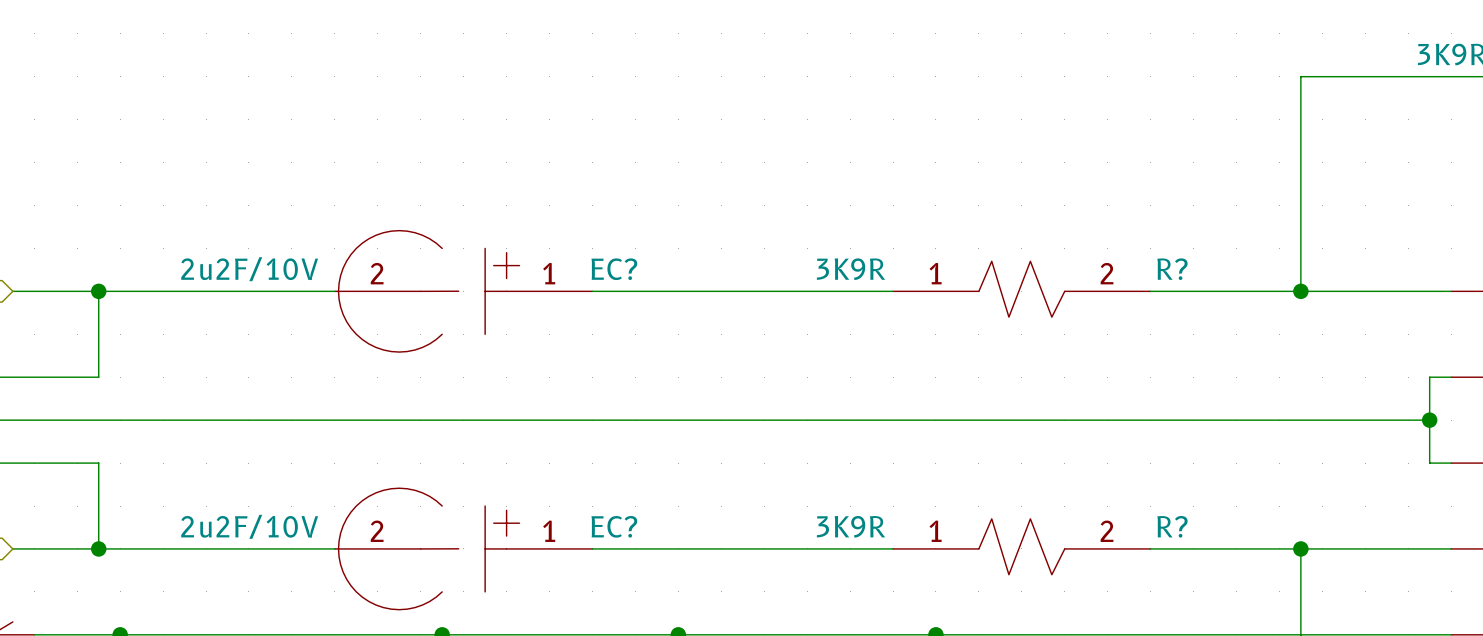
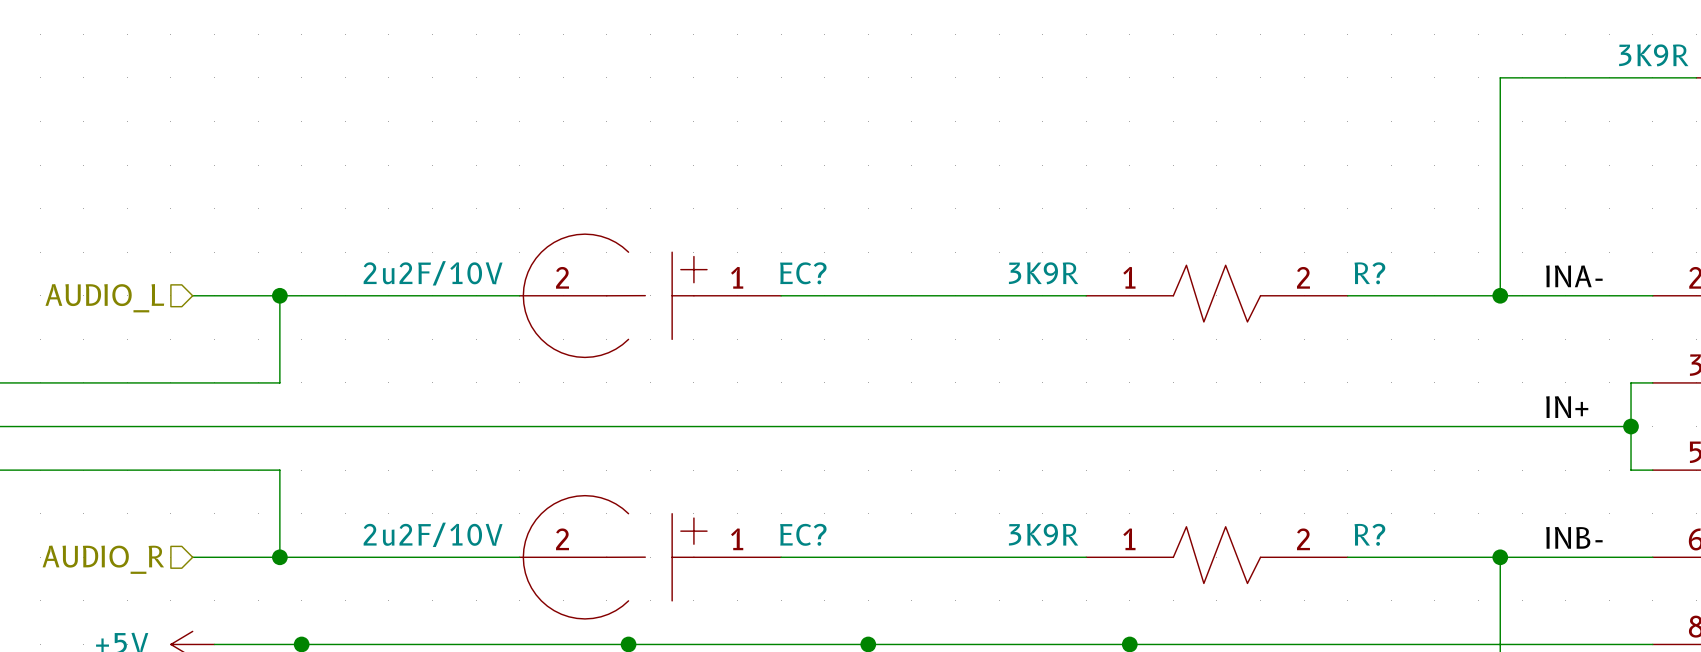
label: none -> INA- (1574, 276)
label: none -> IN+ (1567, 407)
label: none -> INB- (1574, 537)

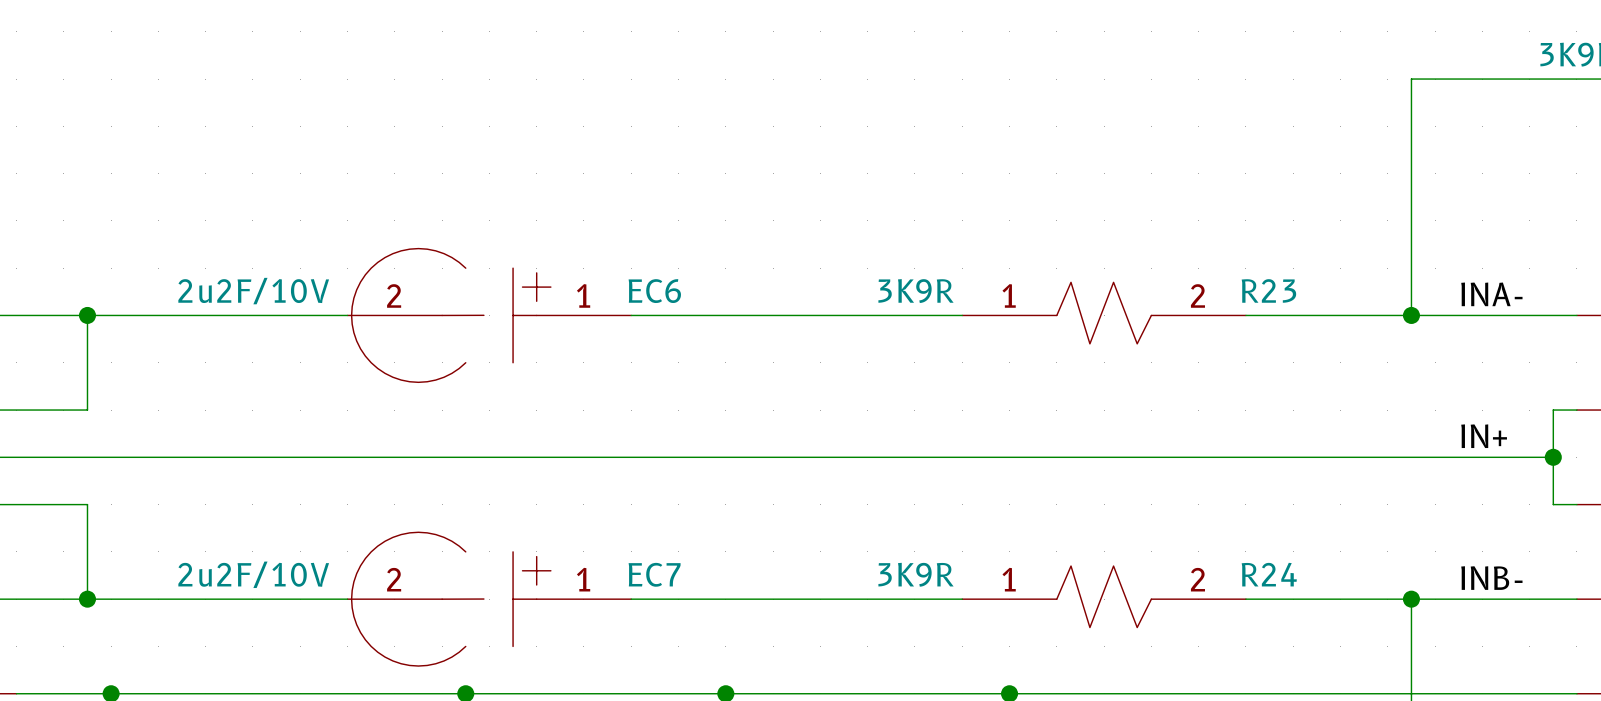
EC? name: EC? (803, 273) -> EC6 (654, 291)
R? name: R? (1369, 273) -> R23 (1268, 290)
EC? name: EC? (803, 534) -> EC7 (654, 574)
R? name: R? (1369, 534) -> R24 (1269, 574)

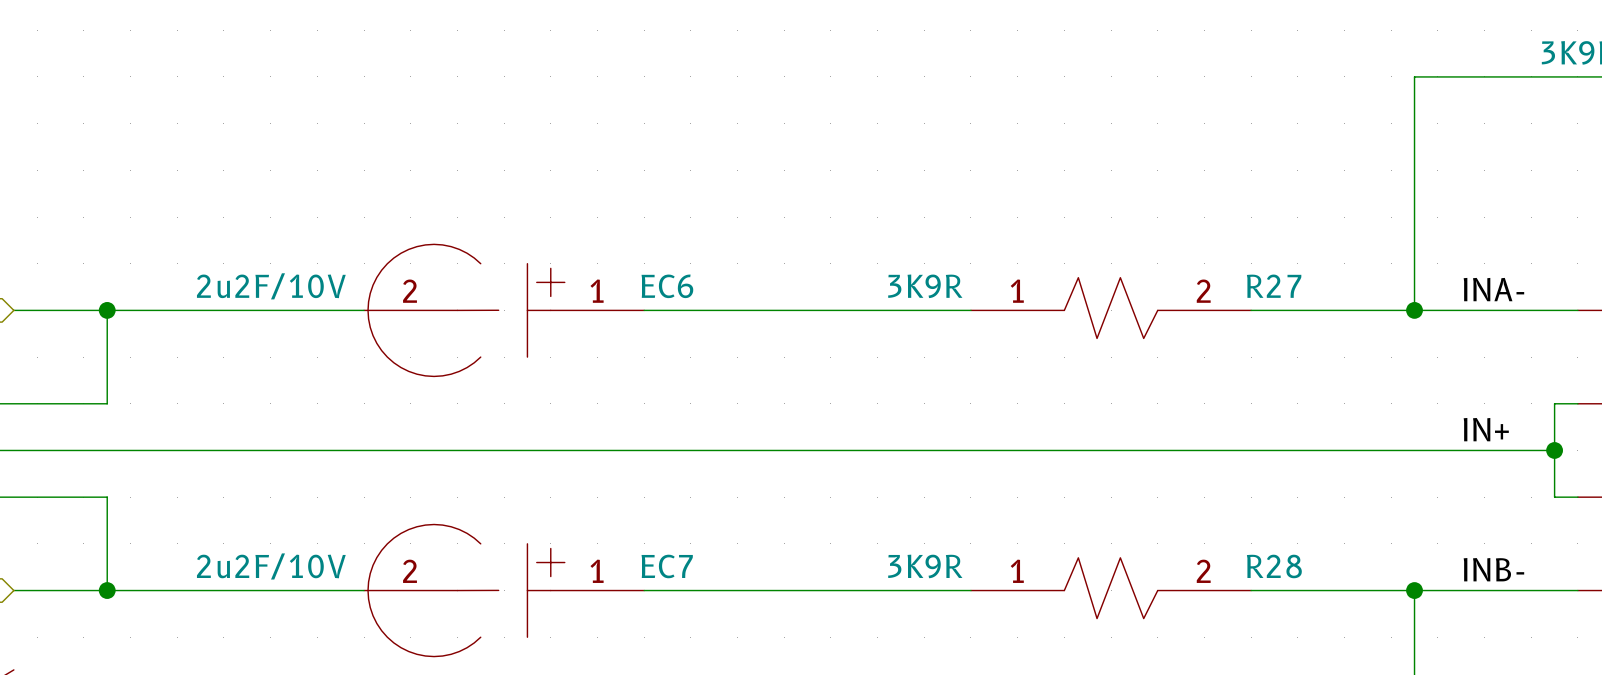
R23 name: R23 (1268, 290) -> R27 (1274, 286)
R24 name: R24 (1269, 574) -> R28 (1274, 566)

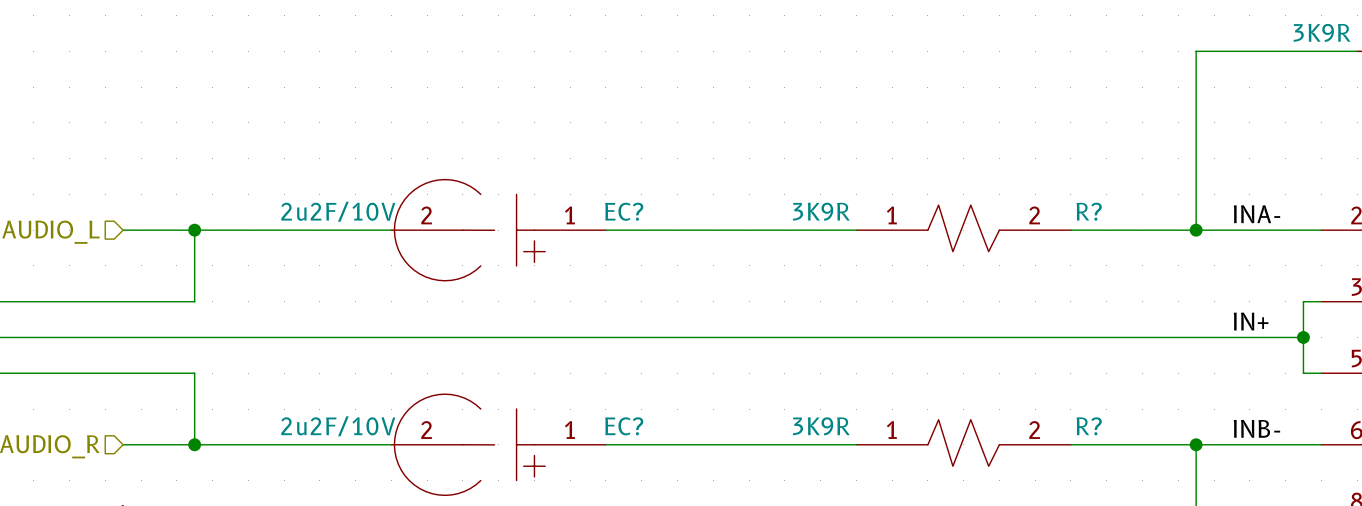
R27 name: R27 (1274, 286) -> R? (1089, 211)
EC6: 2u2F/10V (504, 310) -> none
EC?: none -> 2u2F/10V (498, 230)
R28 name: R28 (1274, 566) -> R? (1089, 426)
EC7: 2u2F/10V (504, 590) -> none
EC?: none -> 2u2F/10V (498, 444)

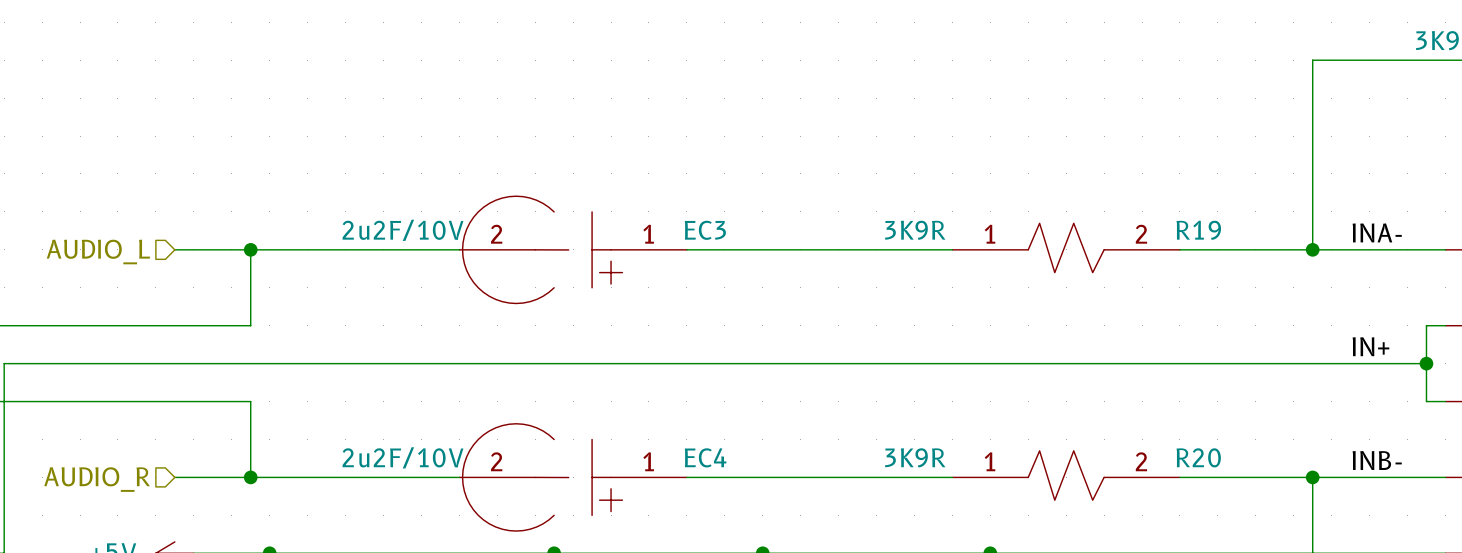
EC? name: EC? (624, 211) -> EC3 (705, 230)
R? name: R? (1089, 211) -> R19 (1198, 230)
EC? name: EC? (624, 426) -> EC4 (705, 457)
R? name: R? (1089, 426) -> R20 (1198, 457)

